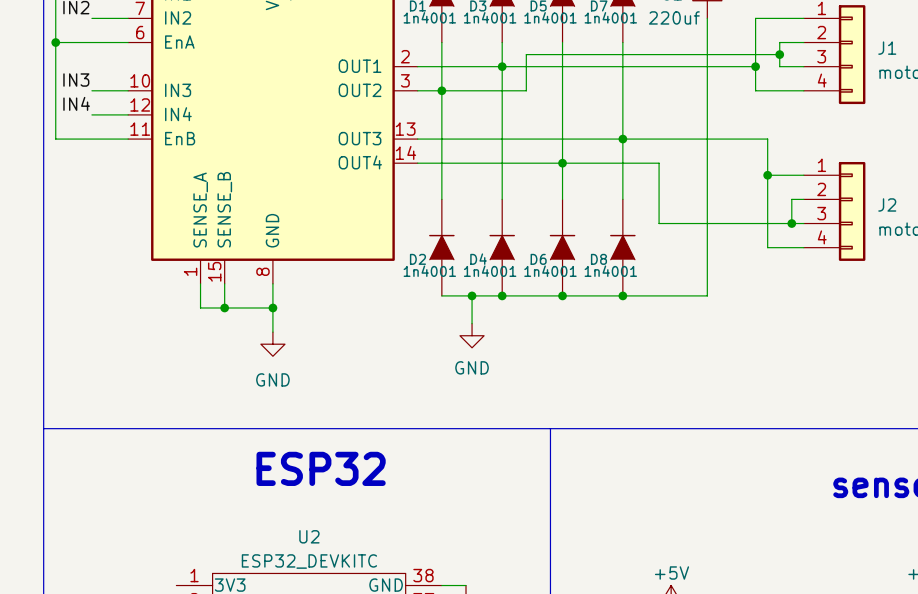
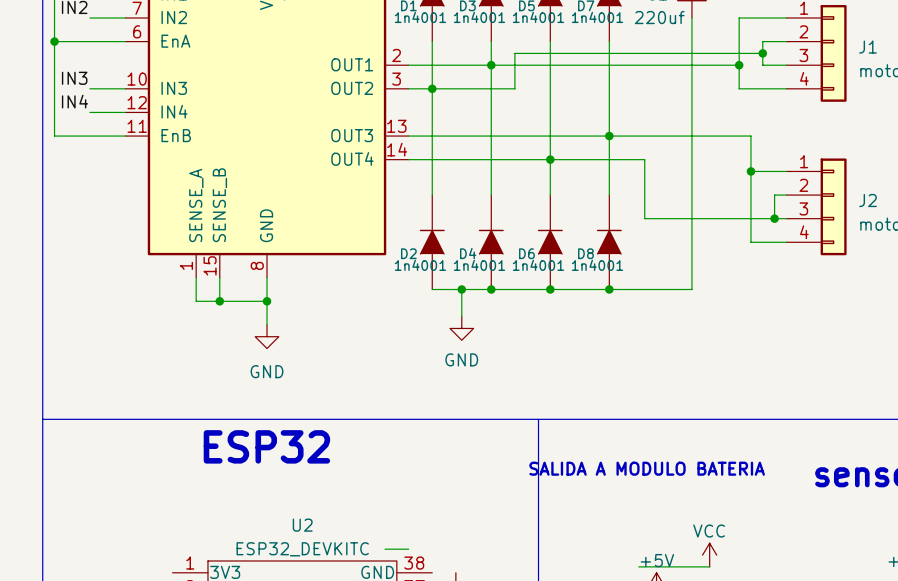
text position: ESP32 (321, 468) -> ESP32 (266, 446)
text: none -> SALIDA A MODULO BATERIA (647, 468)
power symbol: none -> VCC (709, 555)
wire: none -> (638, 566) (709, 566)
wire: (441, 585) (466, 585) -> (385, 549) (408, 549)

